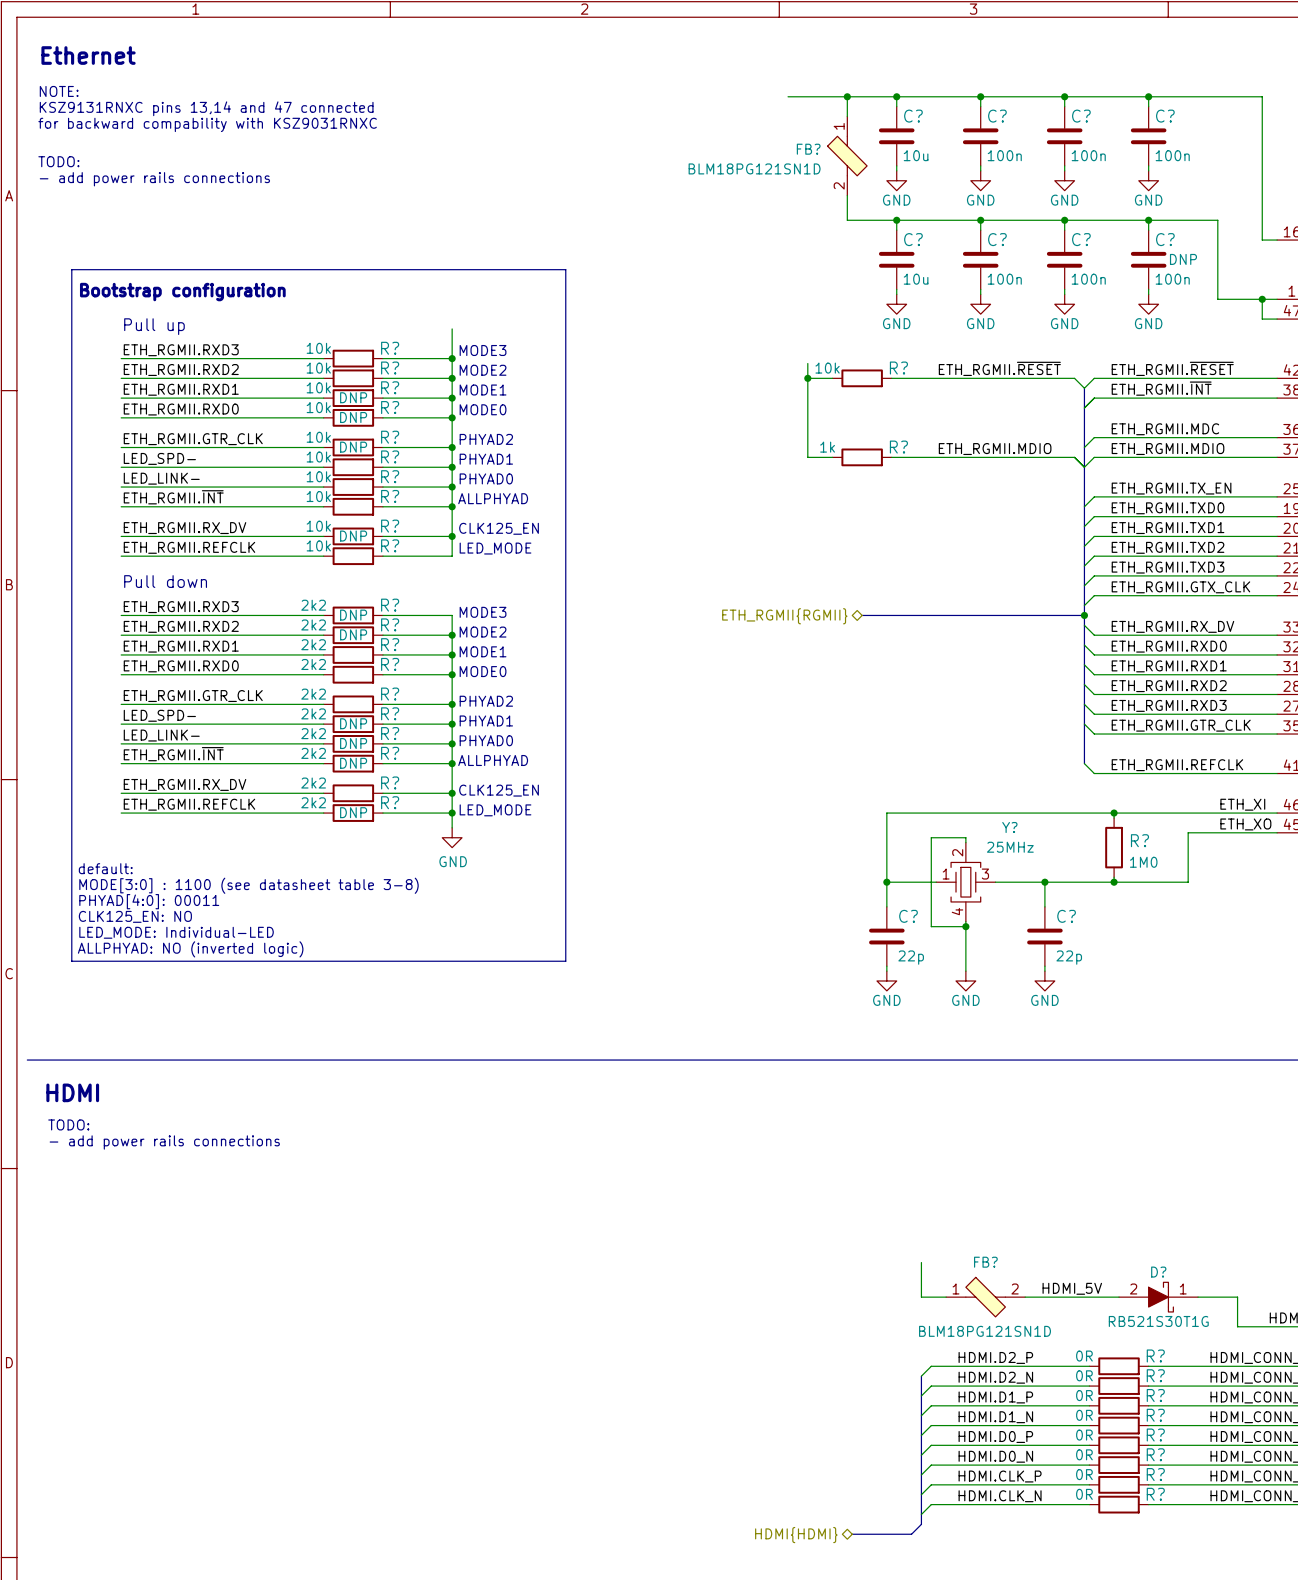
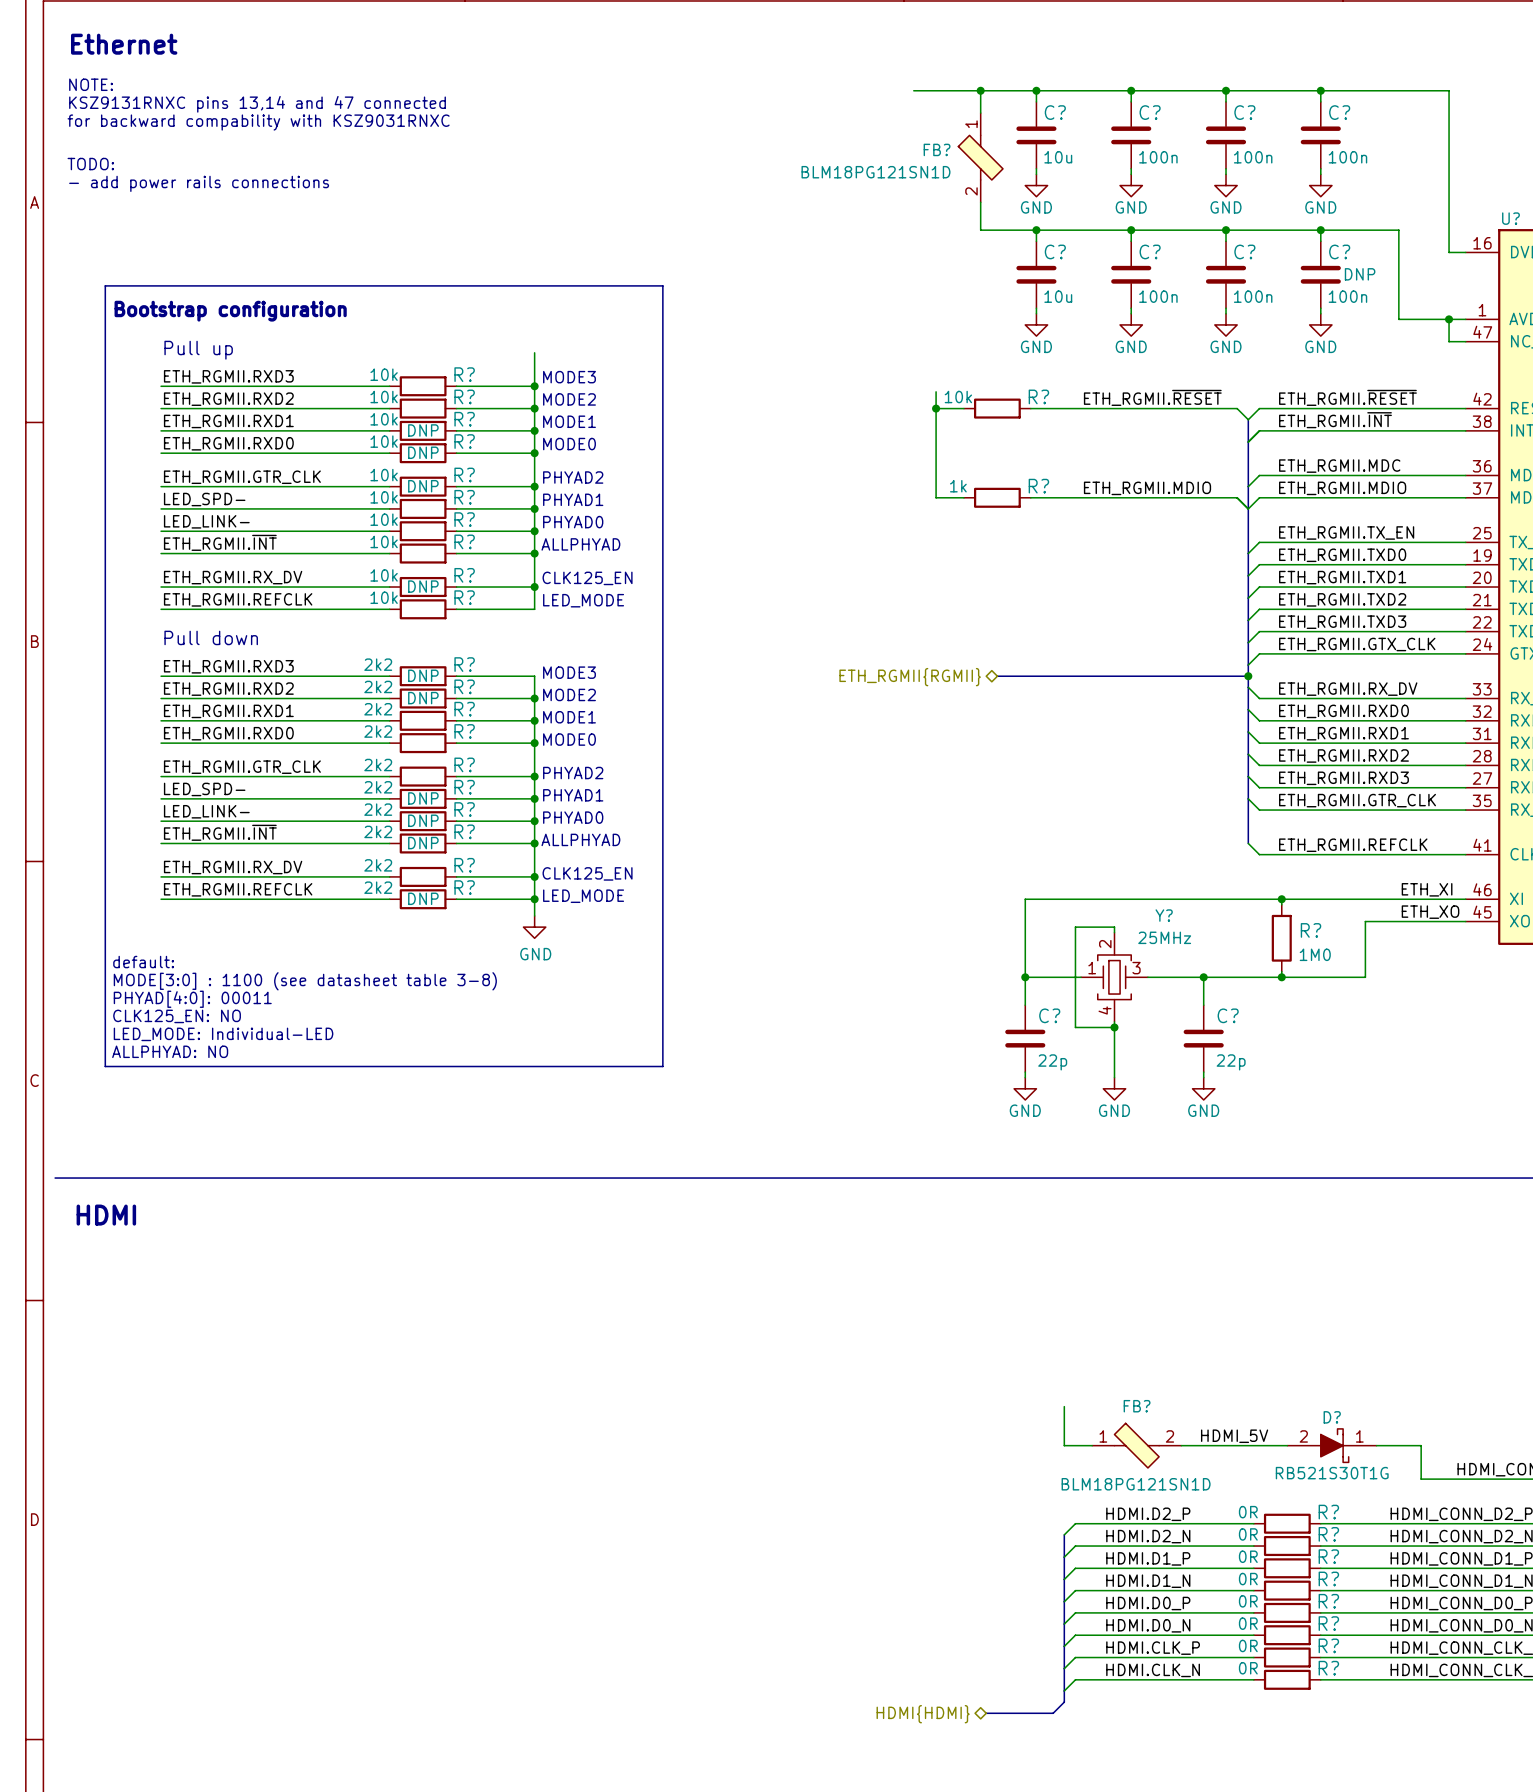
text: ALLPHYAD: NO (inverted logic) (190, 949) -> ALLPHYAD: NO (170, 1051)
text: TODO: (68, 1124) -> none
text: - add power rails connections (164, 1142) -> none

